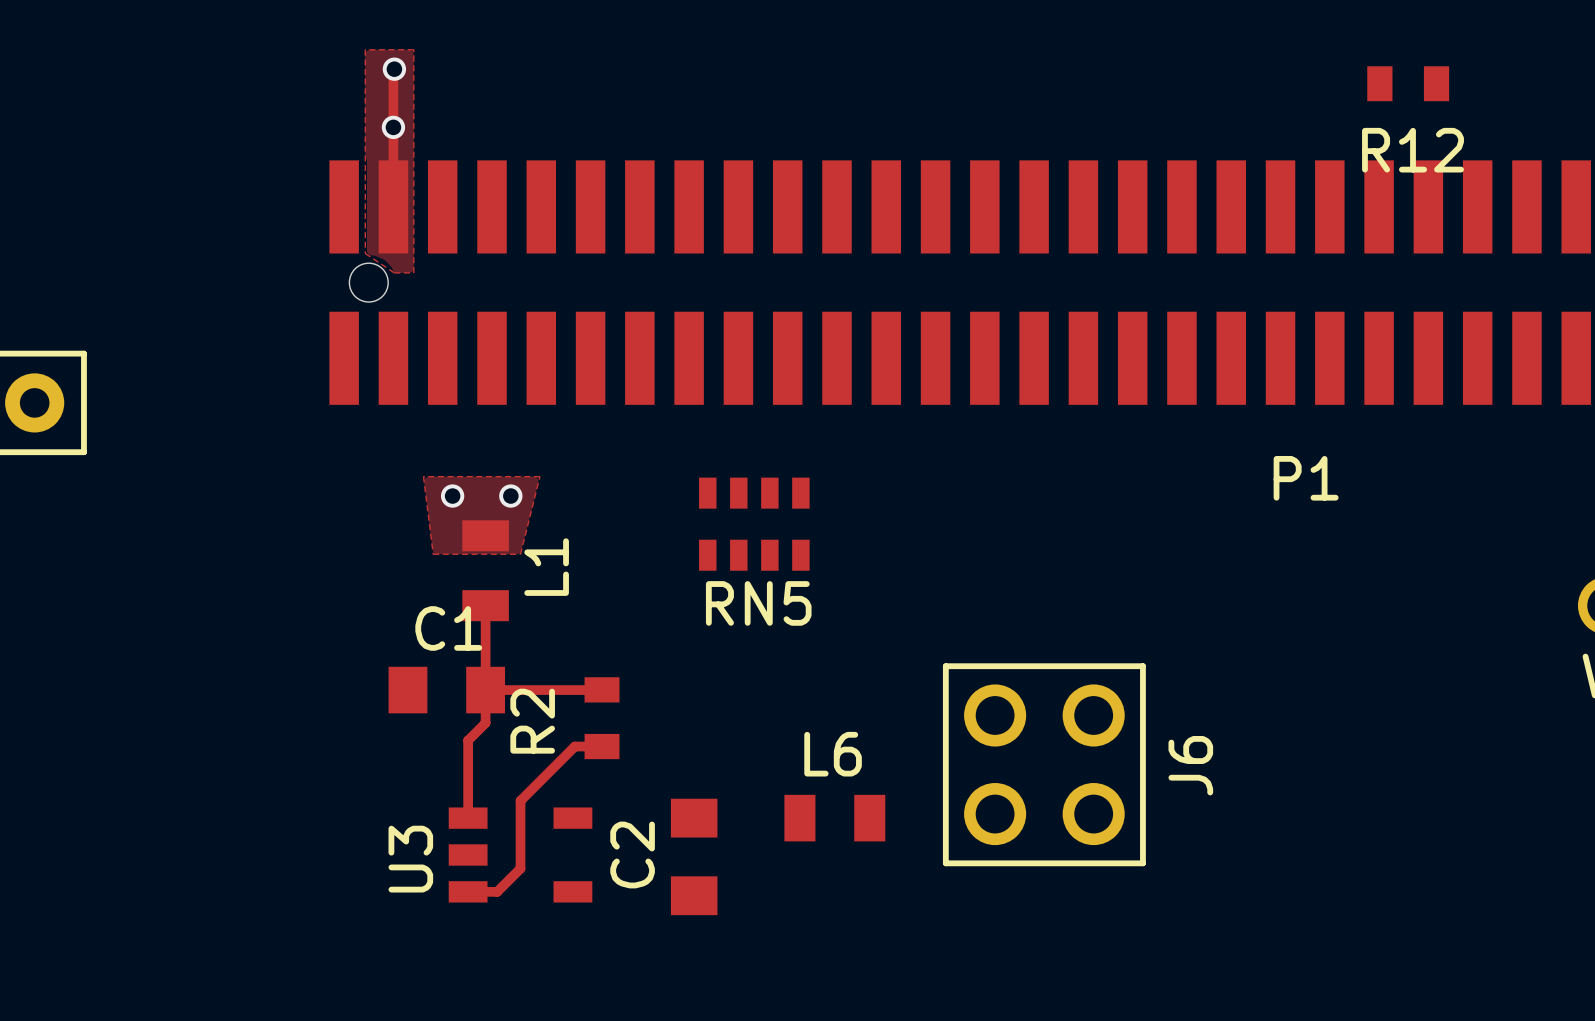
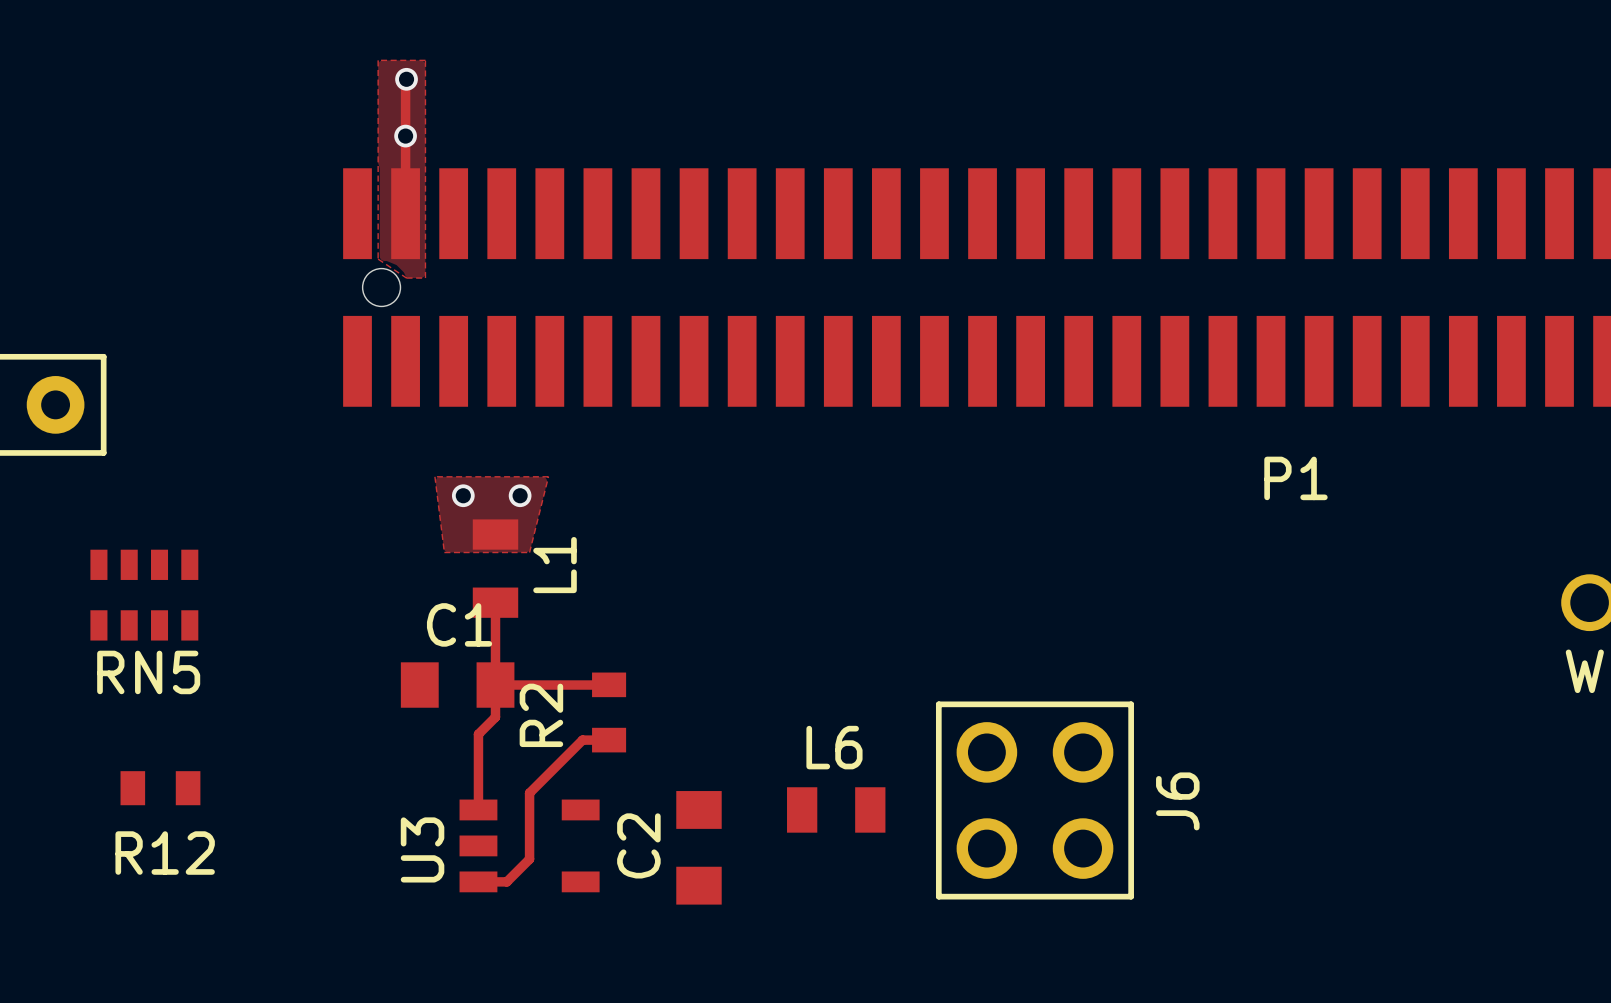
R12 position: (1408, 83) -> (160, 788)
RN5 position: (754, 524) -> (144, 595)
J6 position: (1044, 764) -> (1034, 800)

